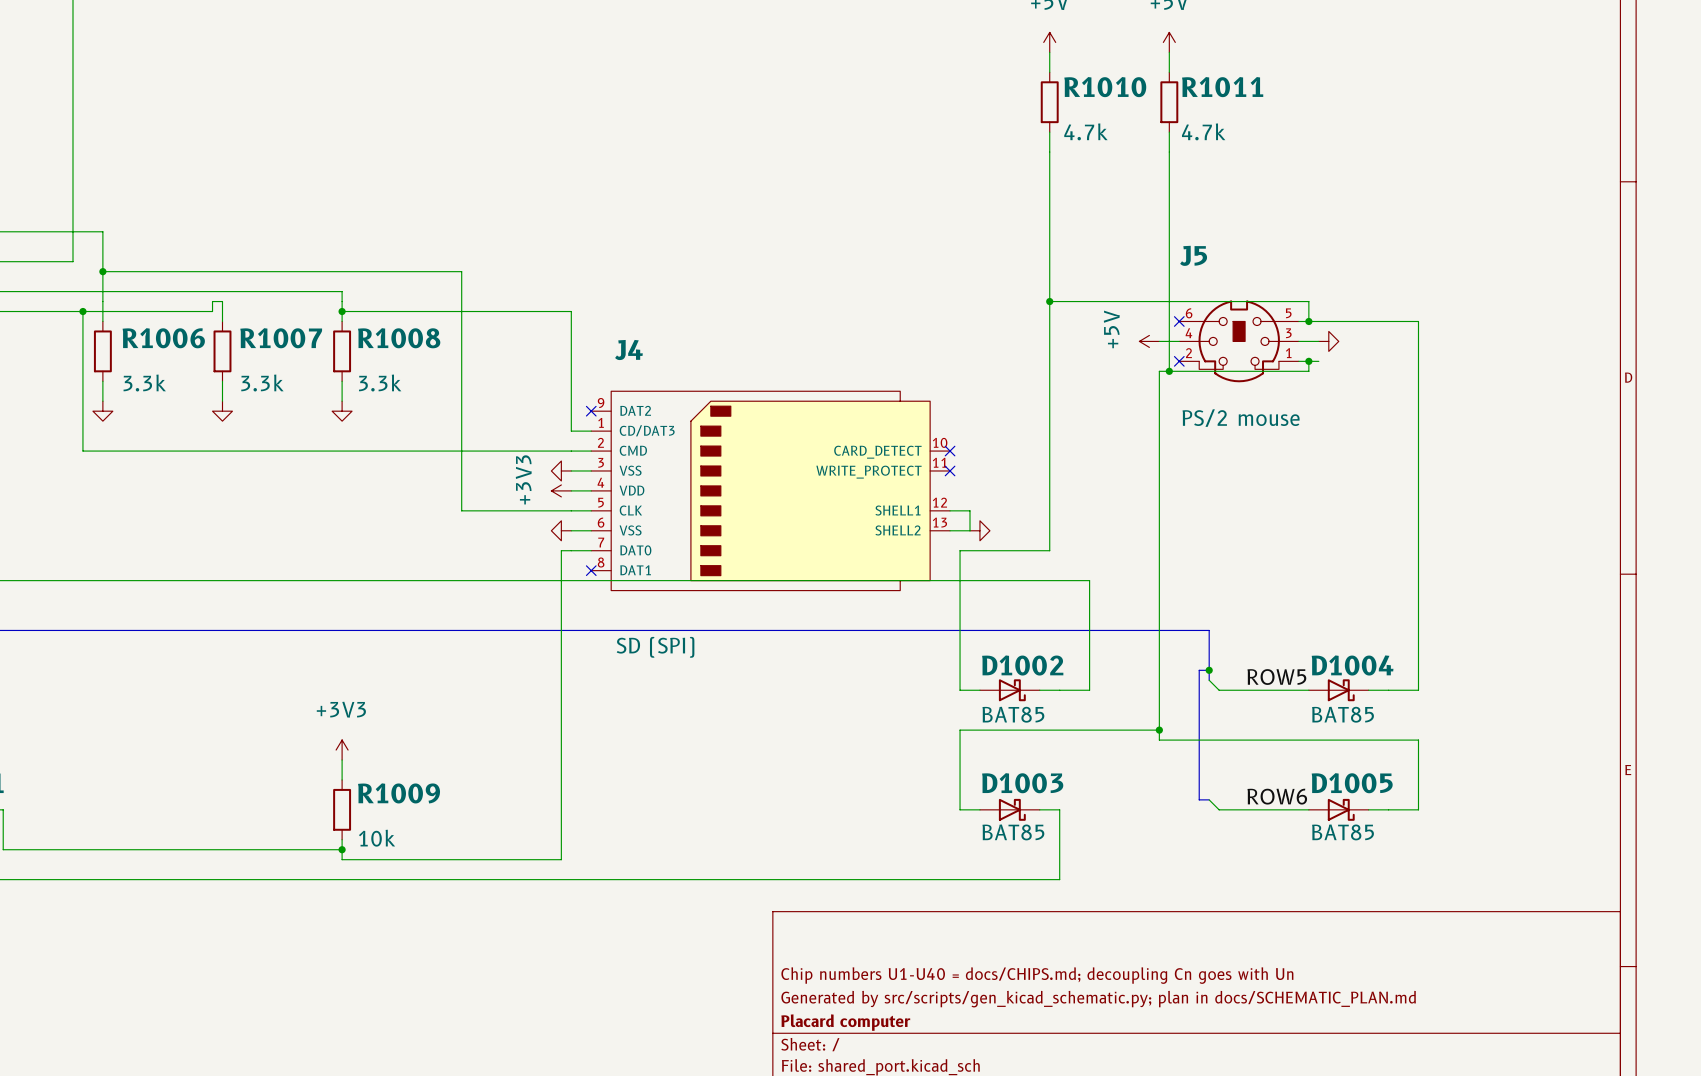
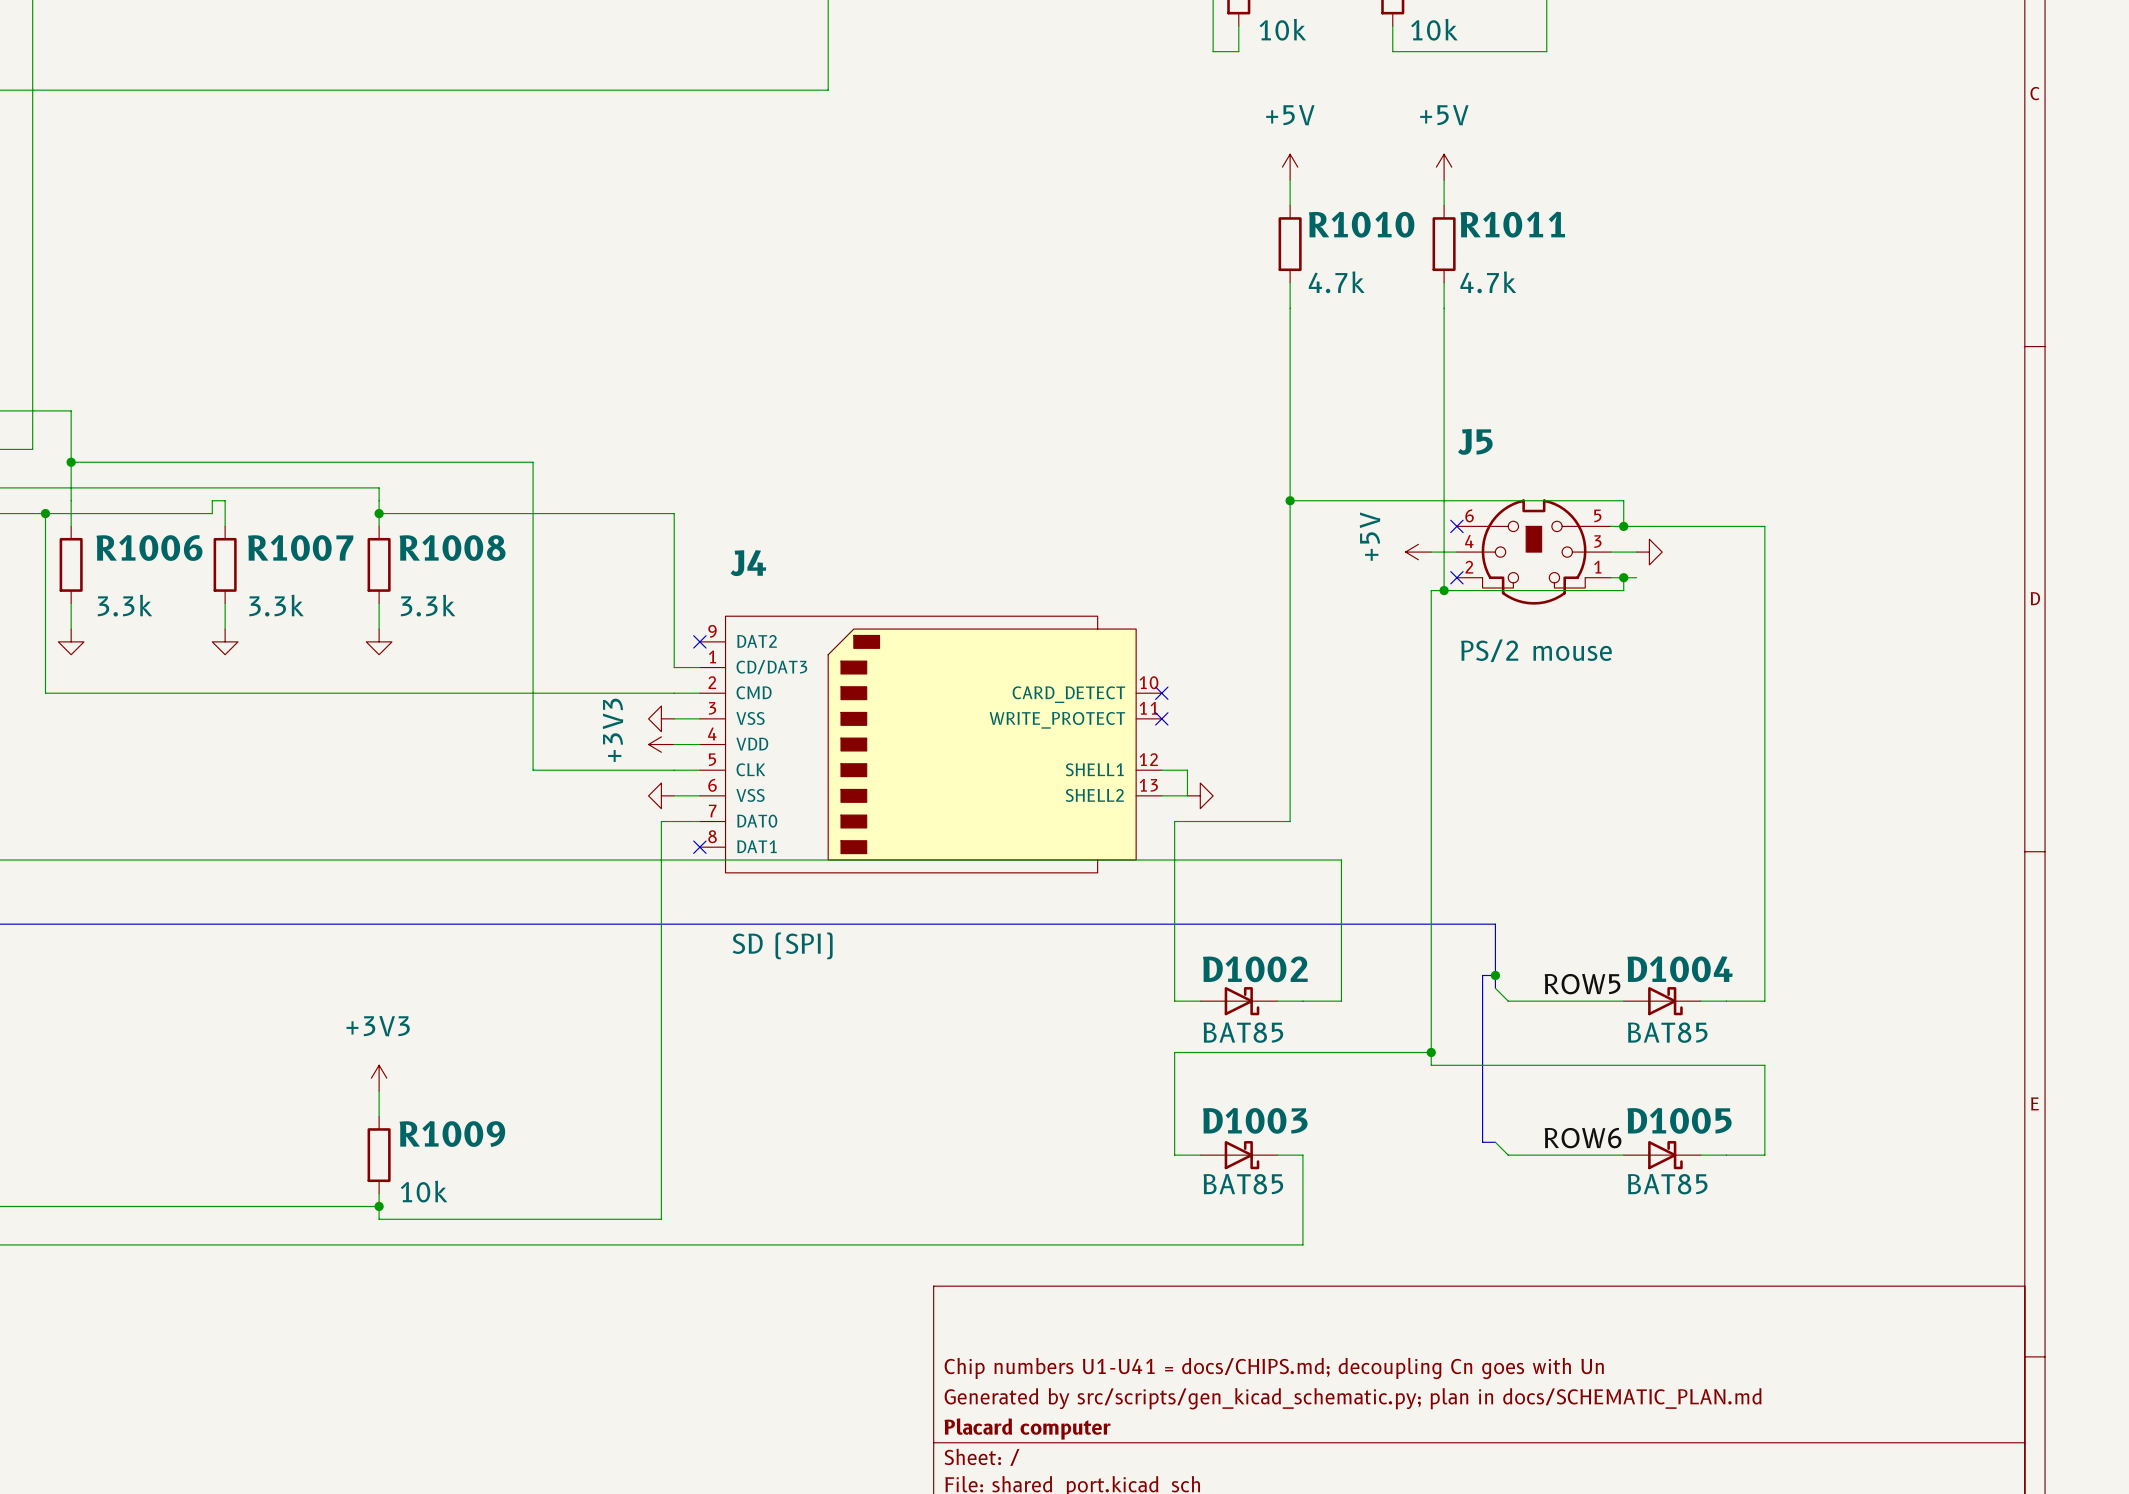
title block: Chip numbers U1-U40 = docs/CHIPS.md; decoupling Cn goes with Un (1037, 975) -> Chip numbers U1-U41 = docs/CHIPS.md; decoupling Cn goes with Un (1274, 1368)

